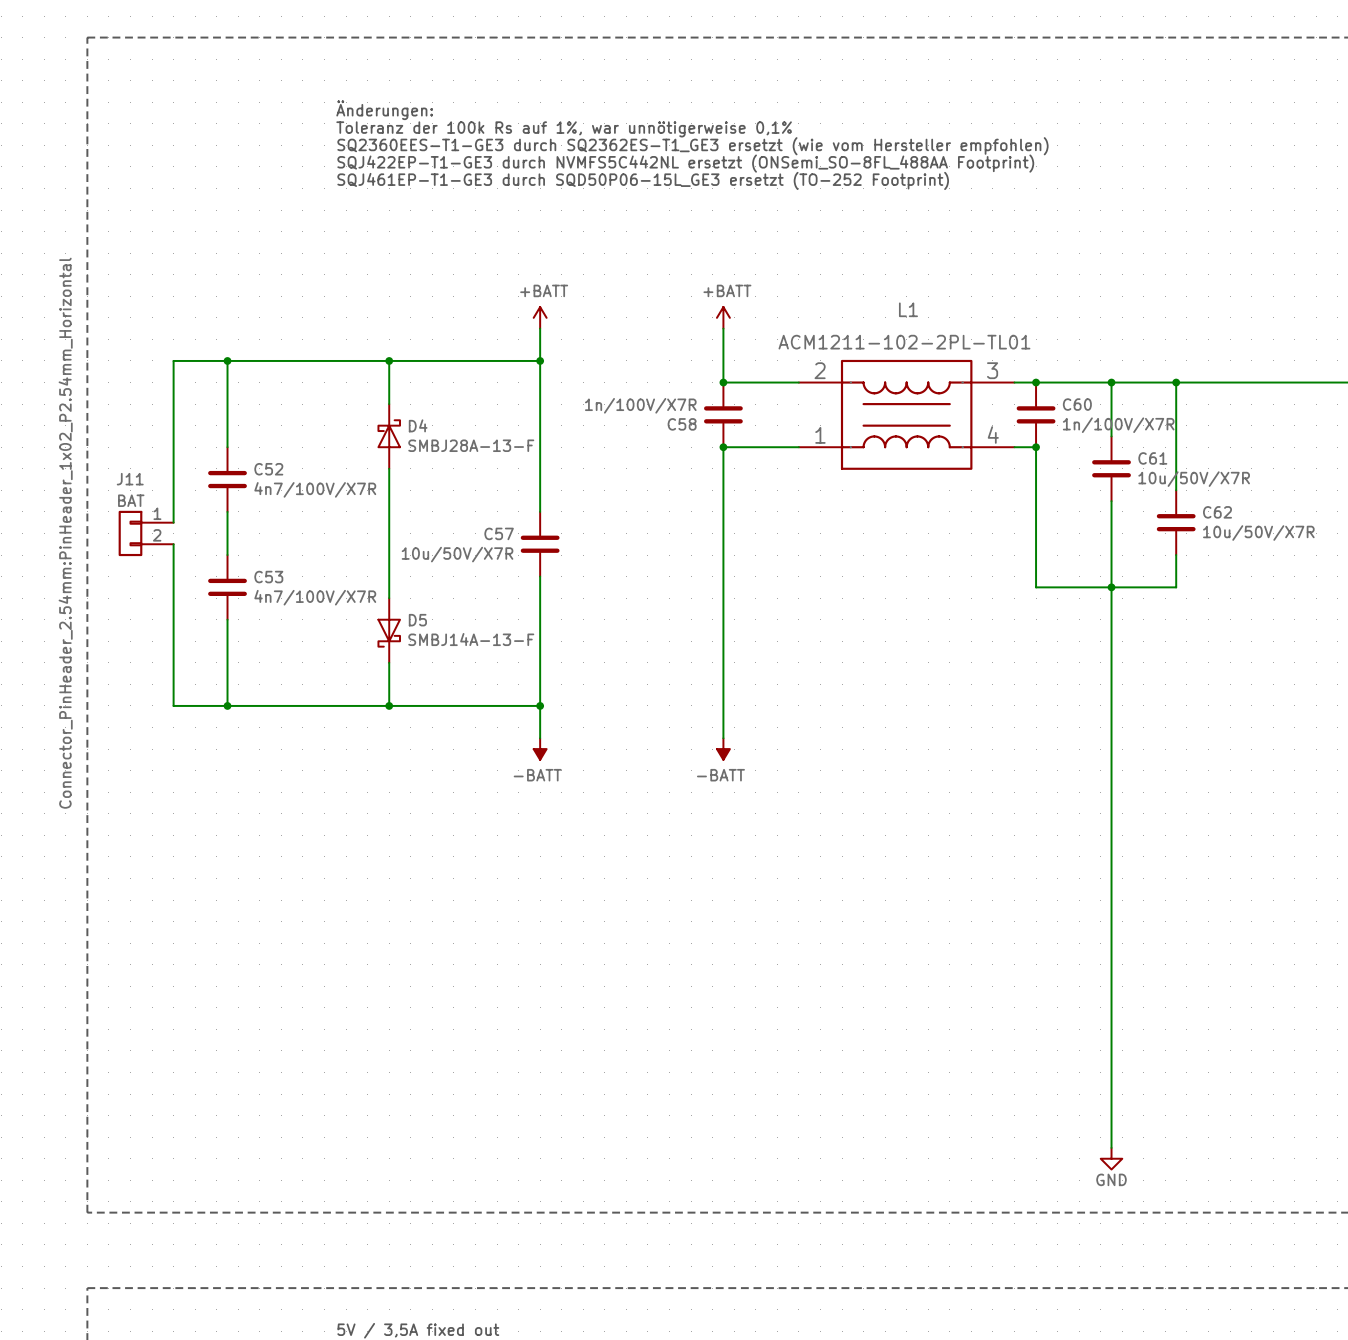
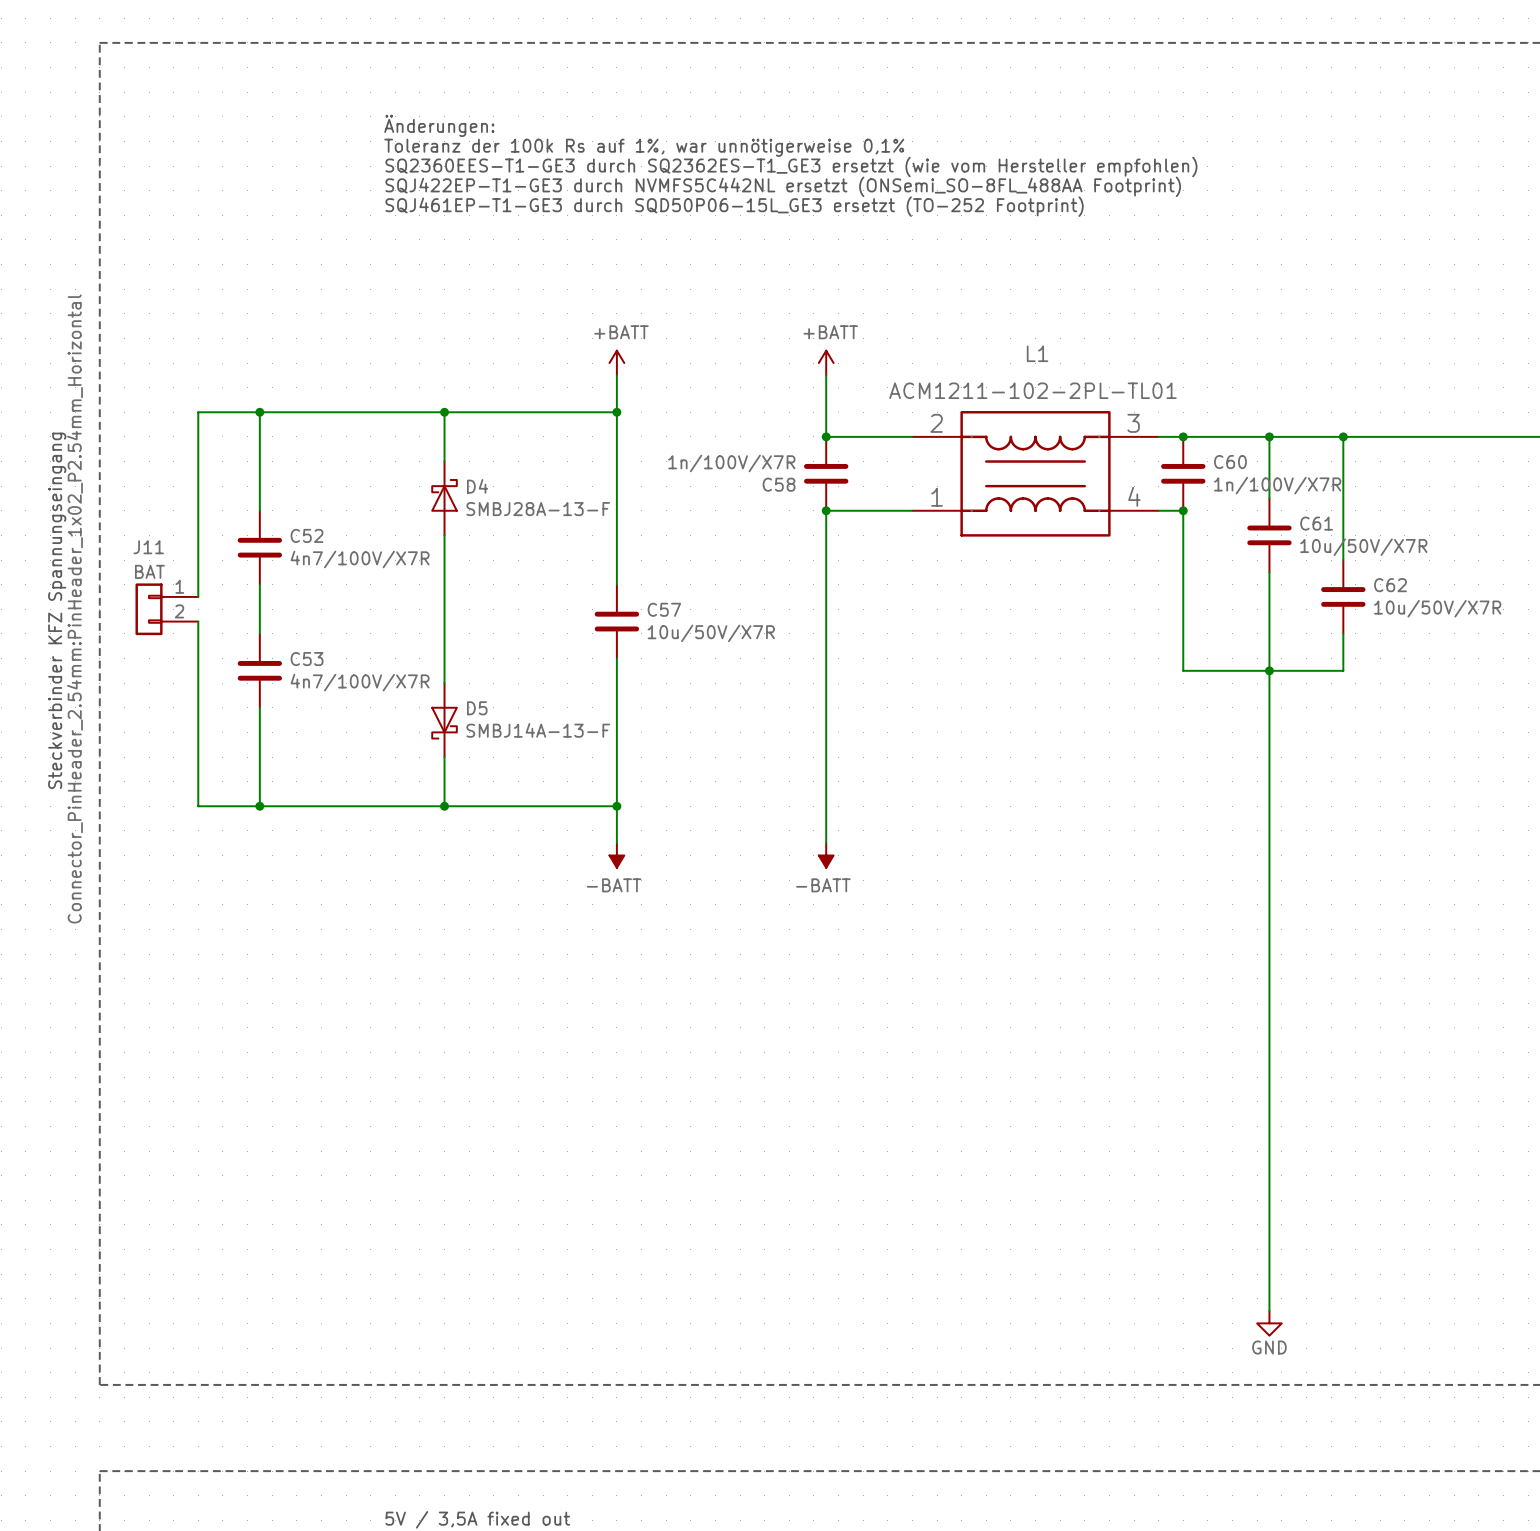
C57 name position: C57 (499, 533) -> C57 (664, 609)
text: none -> Steckverbinder KFZ Spannungseingang (57, 610)
C57 value position: 10u/50V/X7R (457, 554) -> 10u/50V/X7R (711, 633)

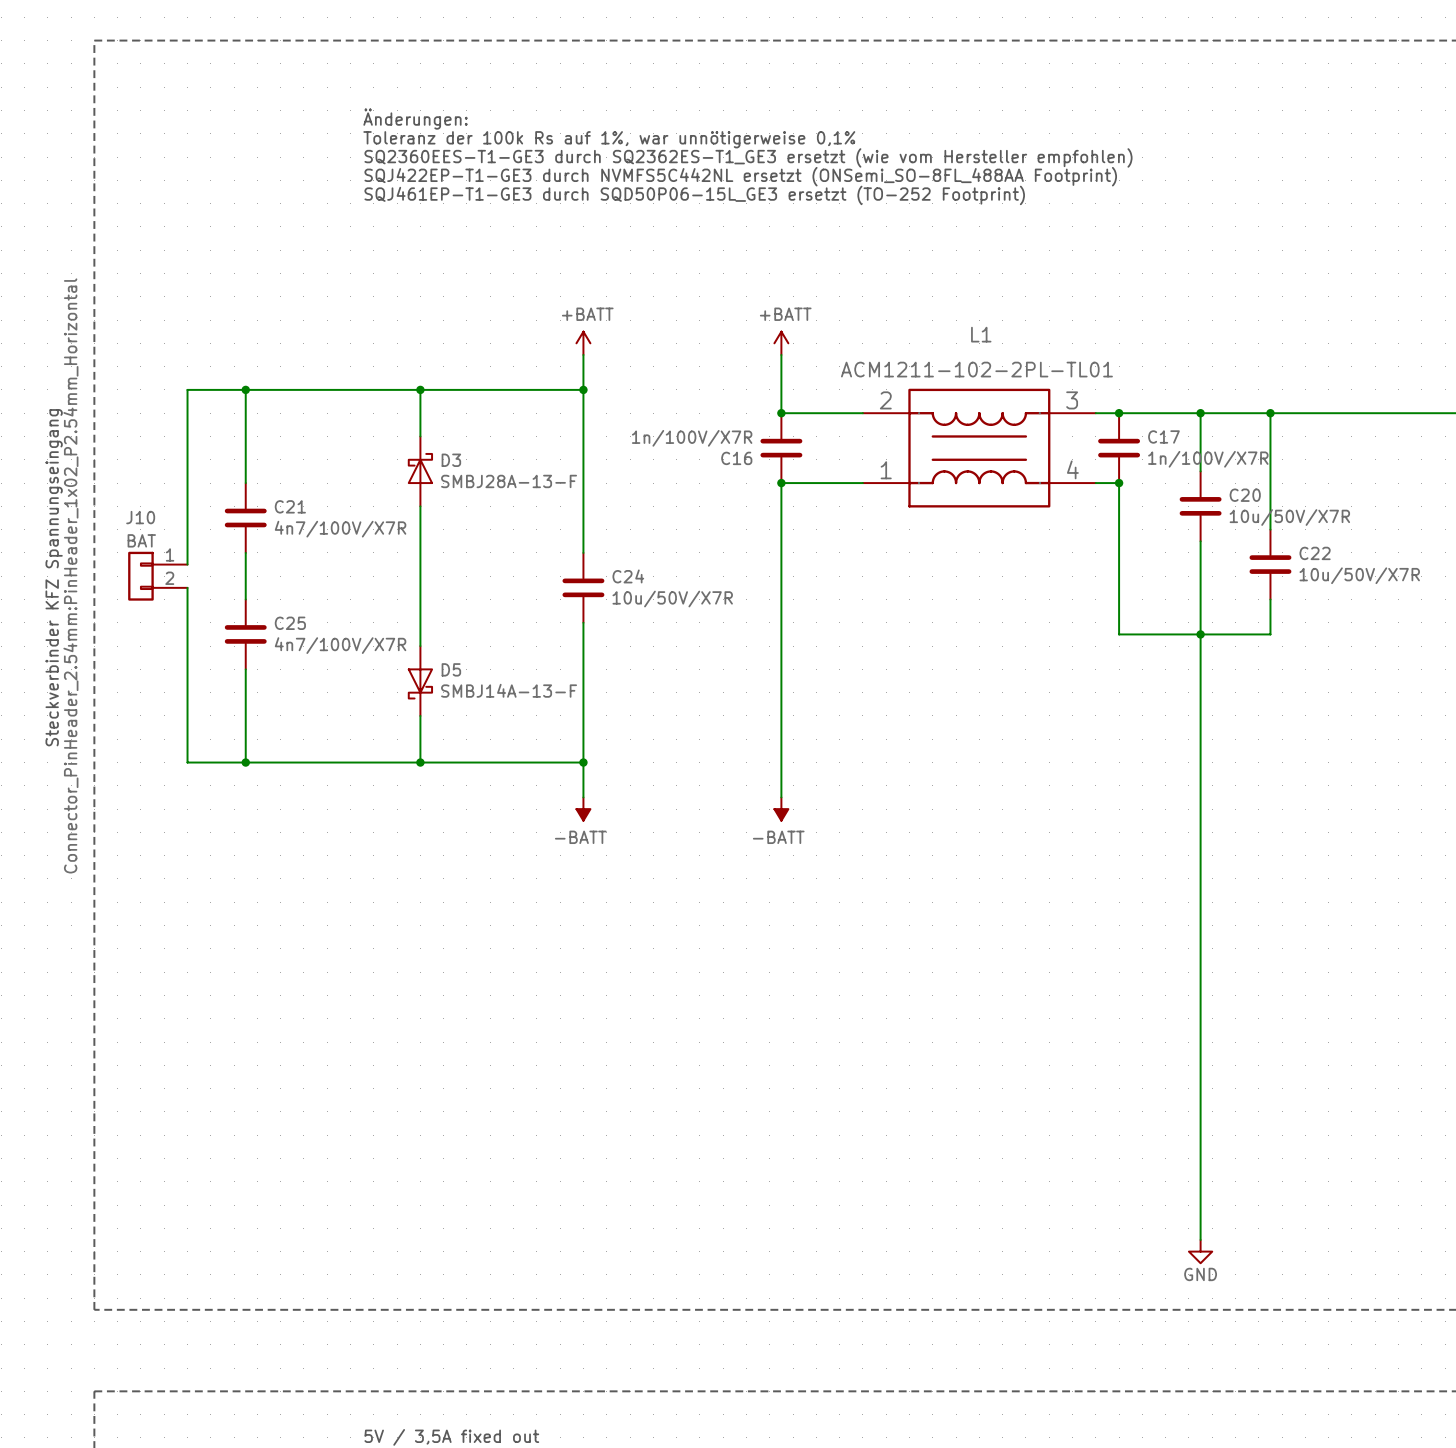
C60 name: C60 (1230, 462) -> C17 (1163, 436)
C58 name: C58 (779, 484) -> C16 (736, 458)
D4 name: D4 (477, 486) -> D3 (451, 460)
C61 name: C61 (1316, 523) -> C20 (1245, 495)
C52 name: C52 (307, 535) -> C21 (290, 506)
J11 name: J11 (148, 547) -> J10 (140, 517)
C62 name: C62 (1390, 585) -> C22 (1315, 553)
C57 name: C57 (664, 609) -> C24 (628, 576)
C53 name: C53 (307, 659) -> C25 (290, 623)

